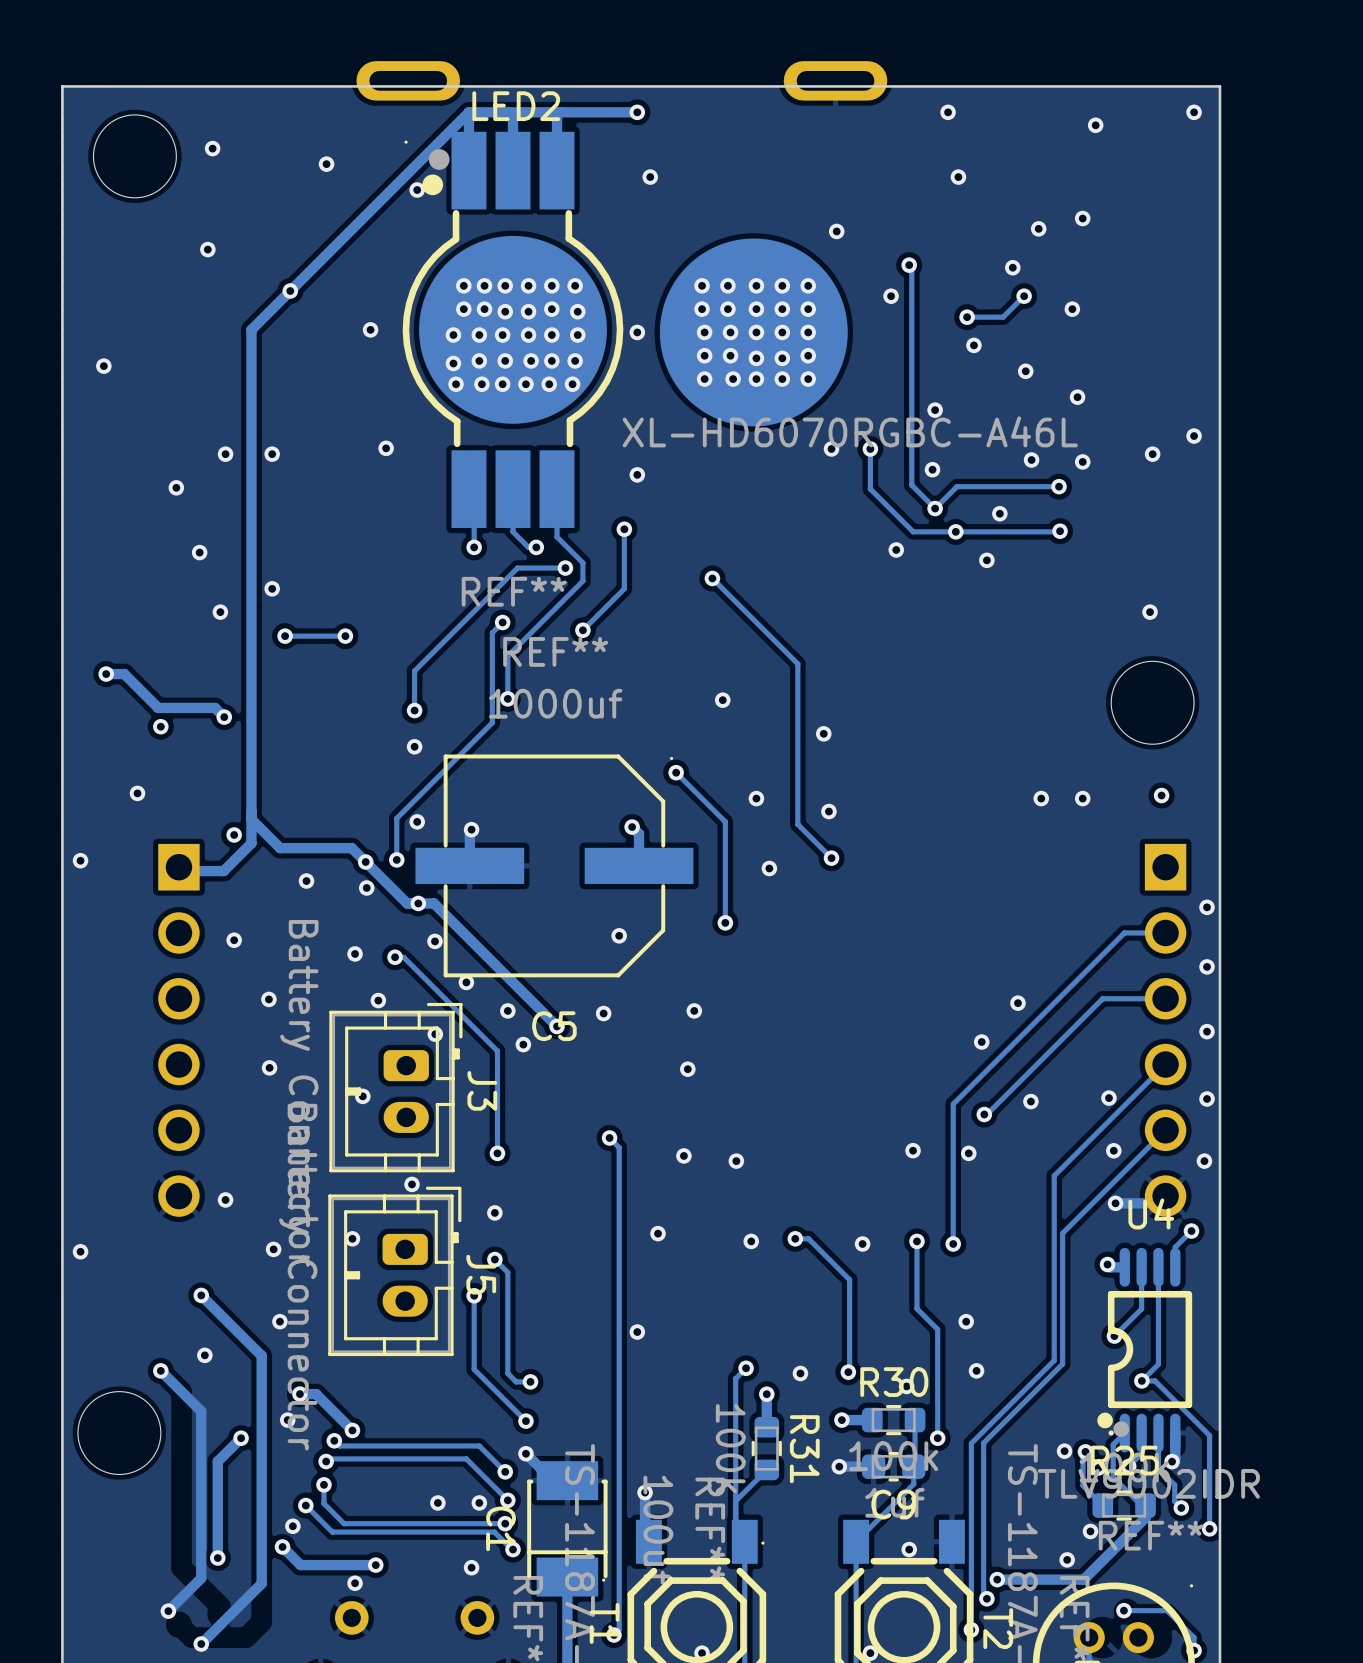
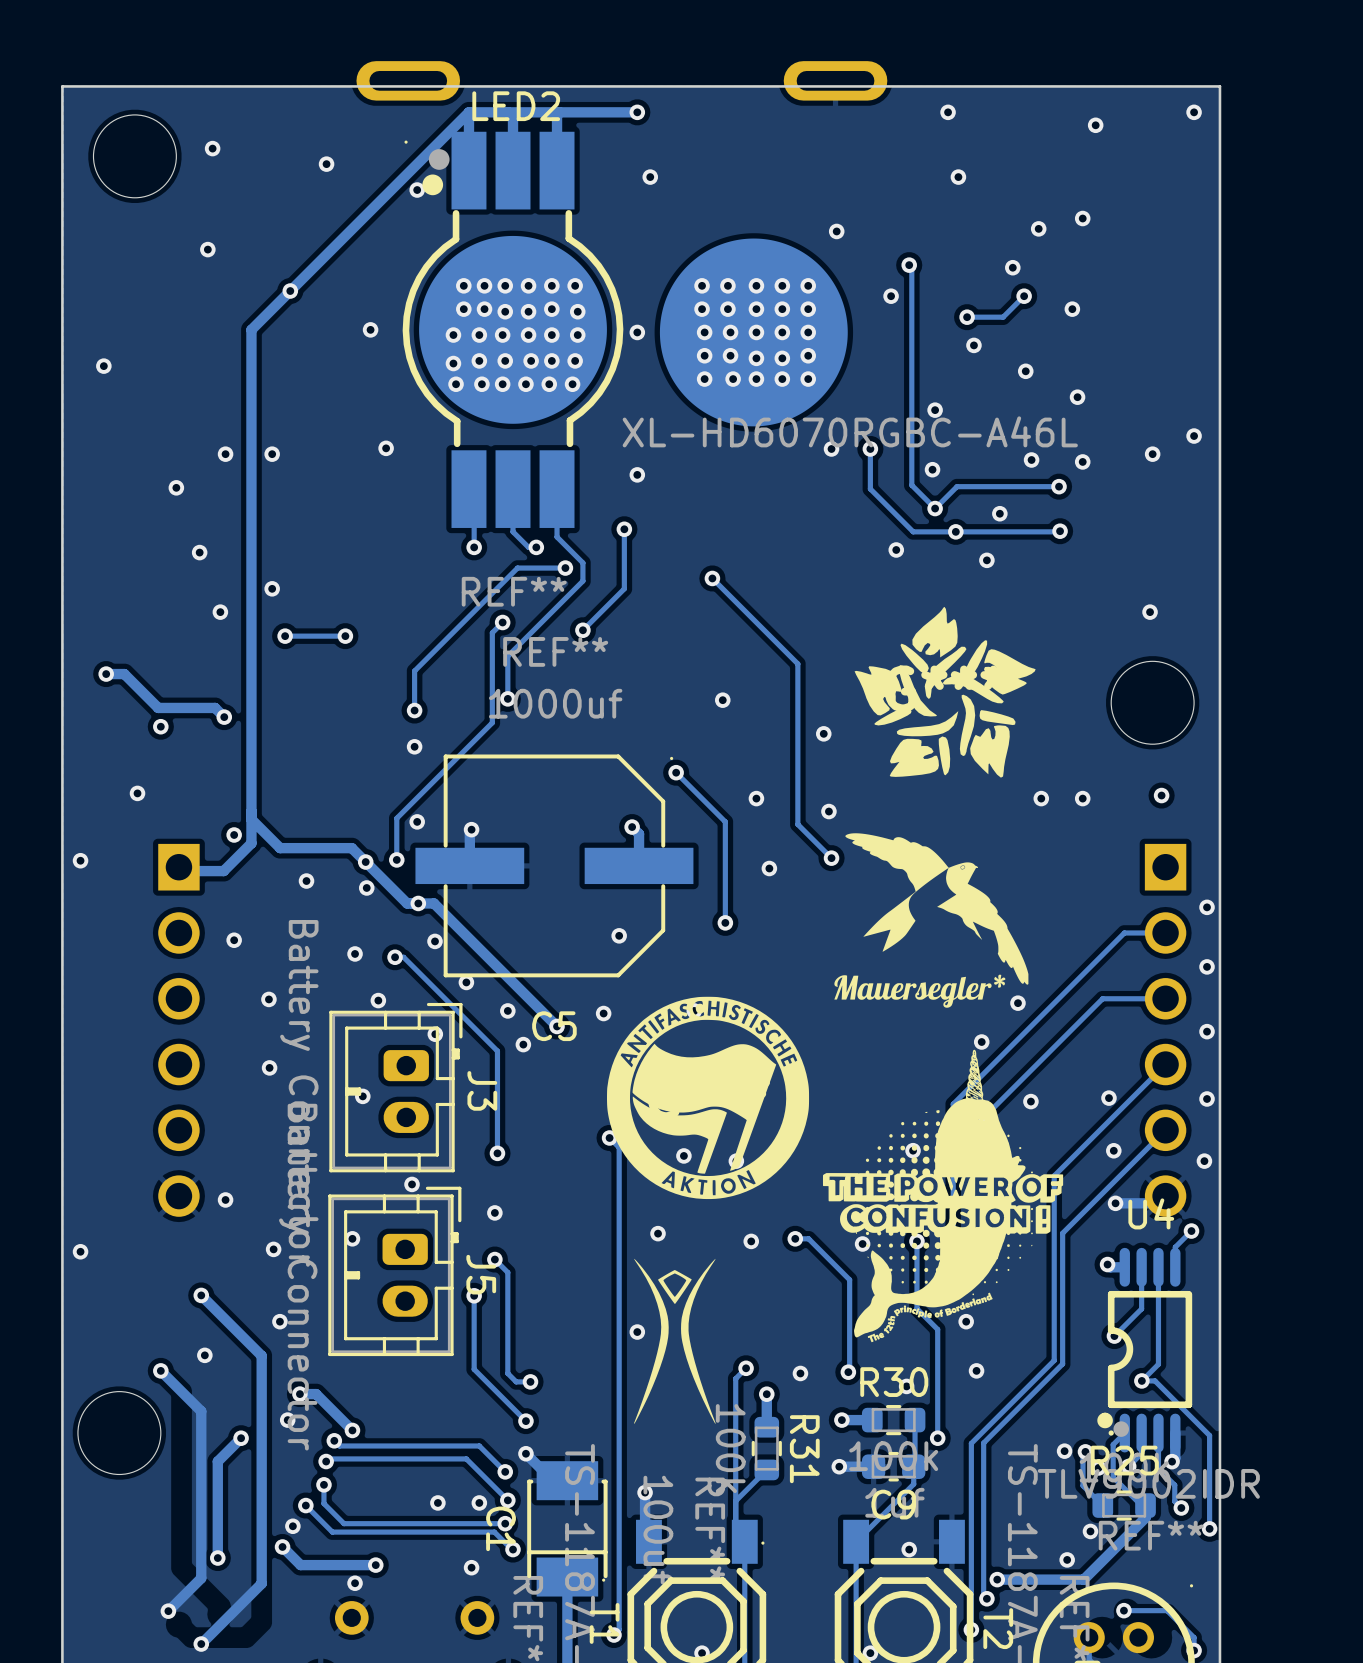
part: none -> (945, 692)
drawing: none -> [834, 833, 1029, 1008]
drawing: none -> [822, 1049, 1064, 1343]
part: none -> (708, 1097)
drawing: none -> [634, 1258, 716, 1424]

